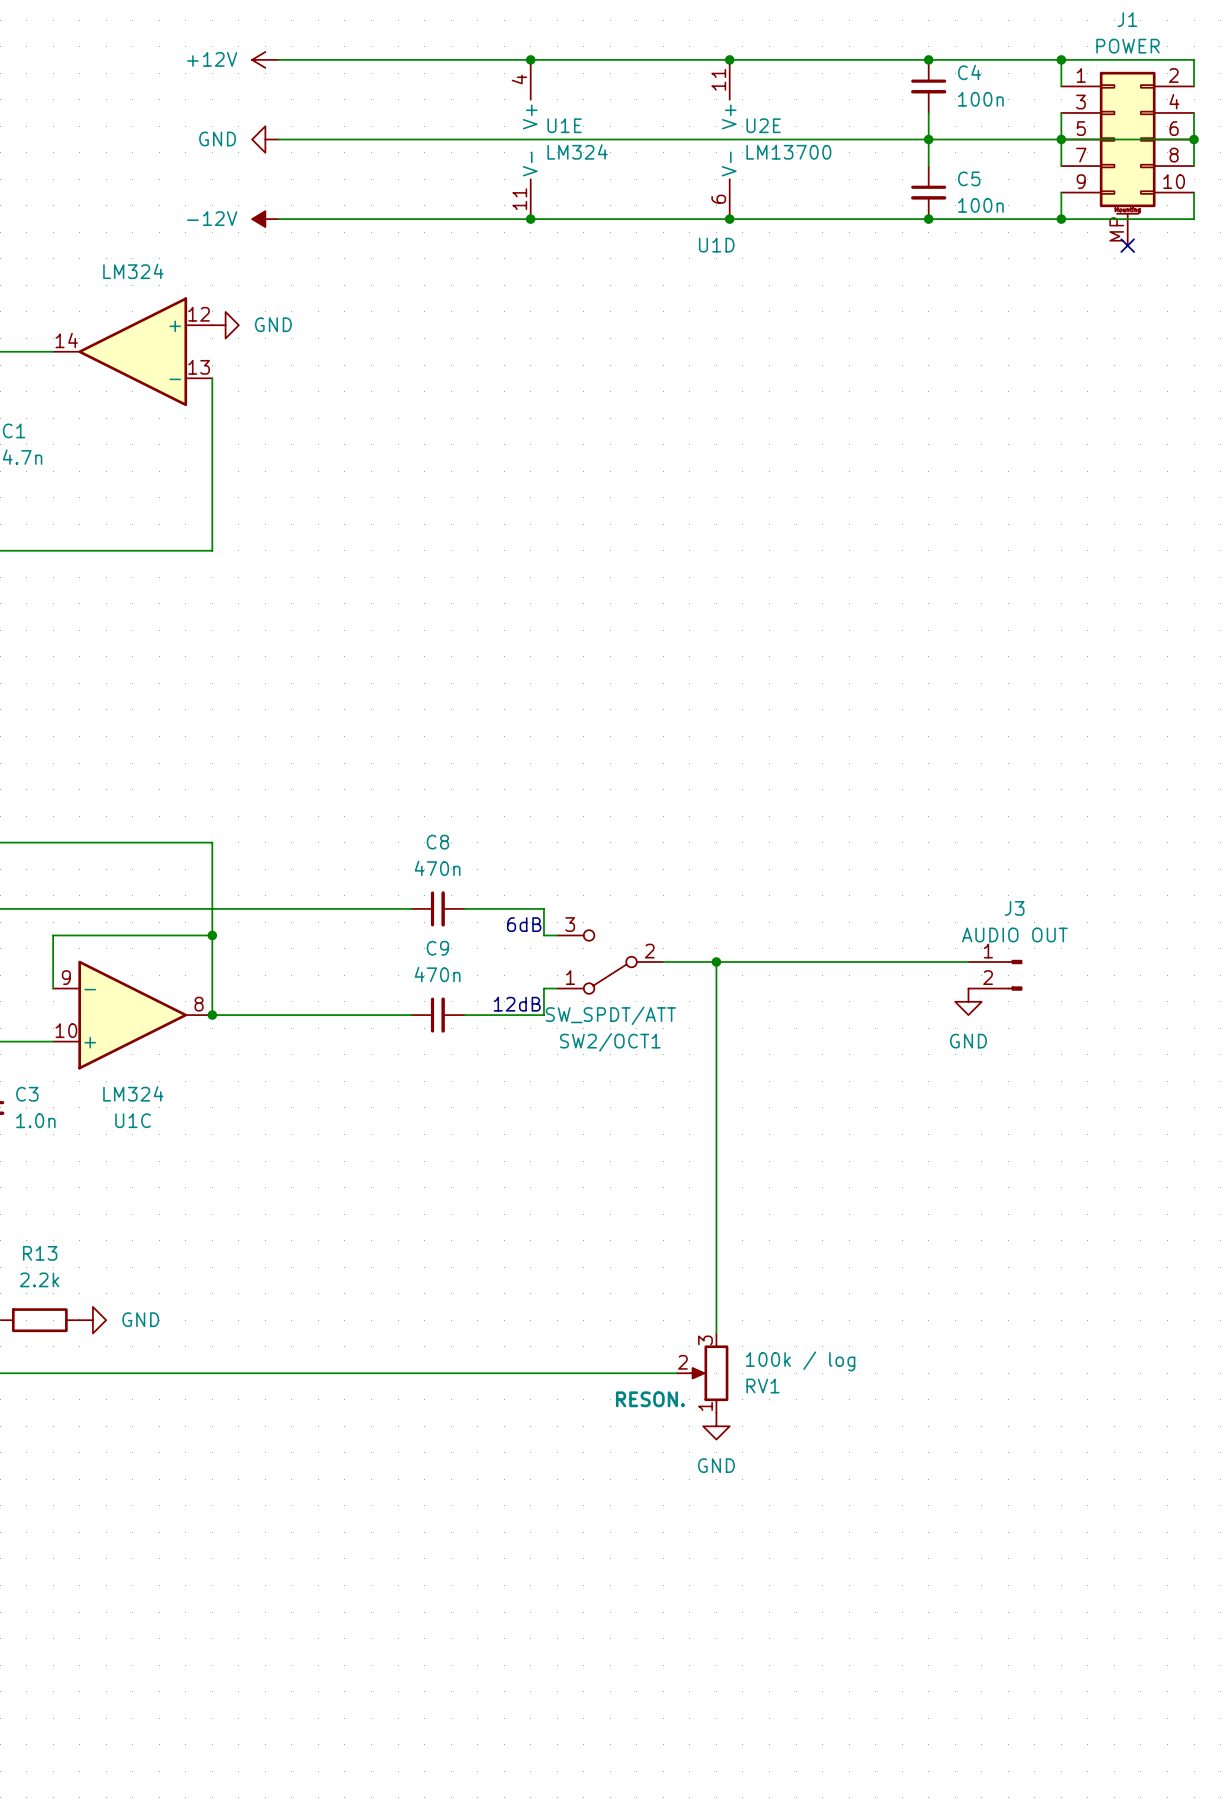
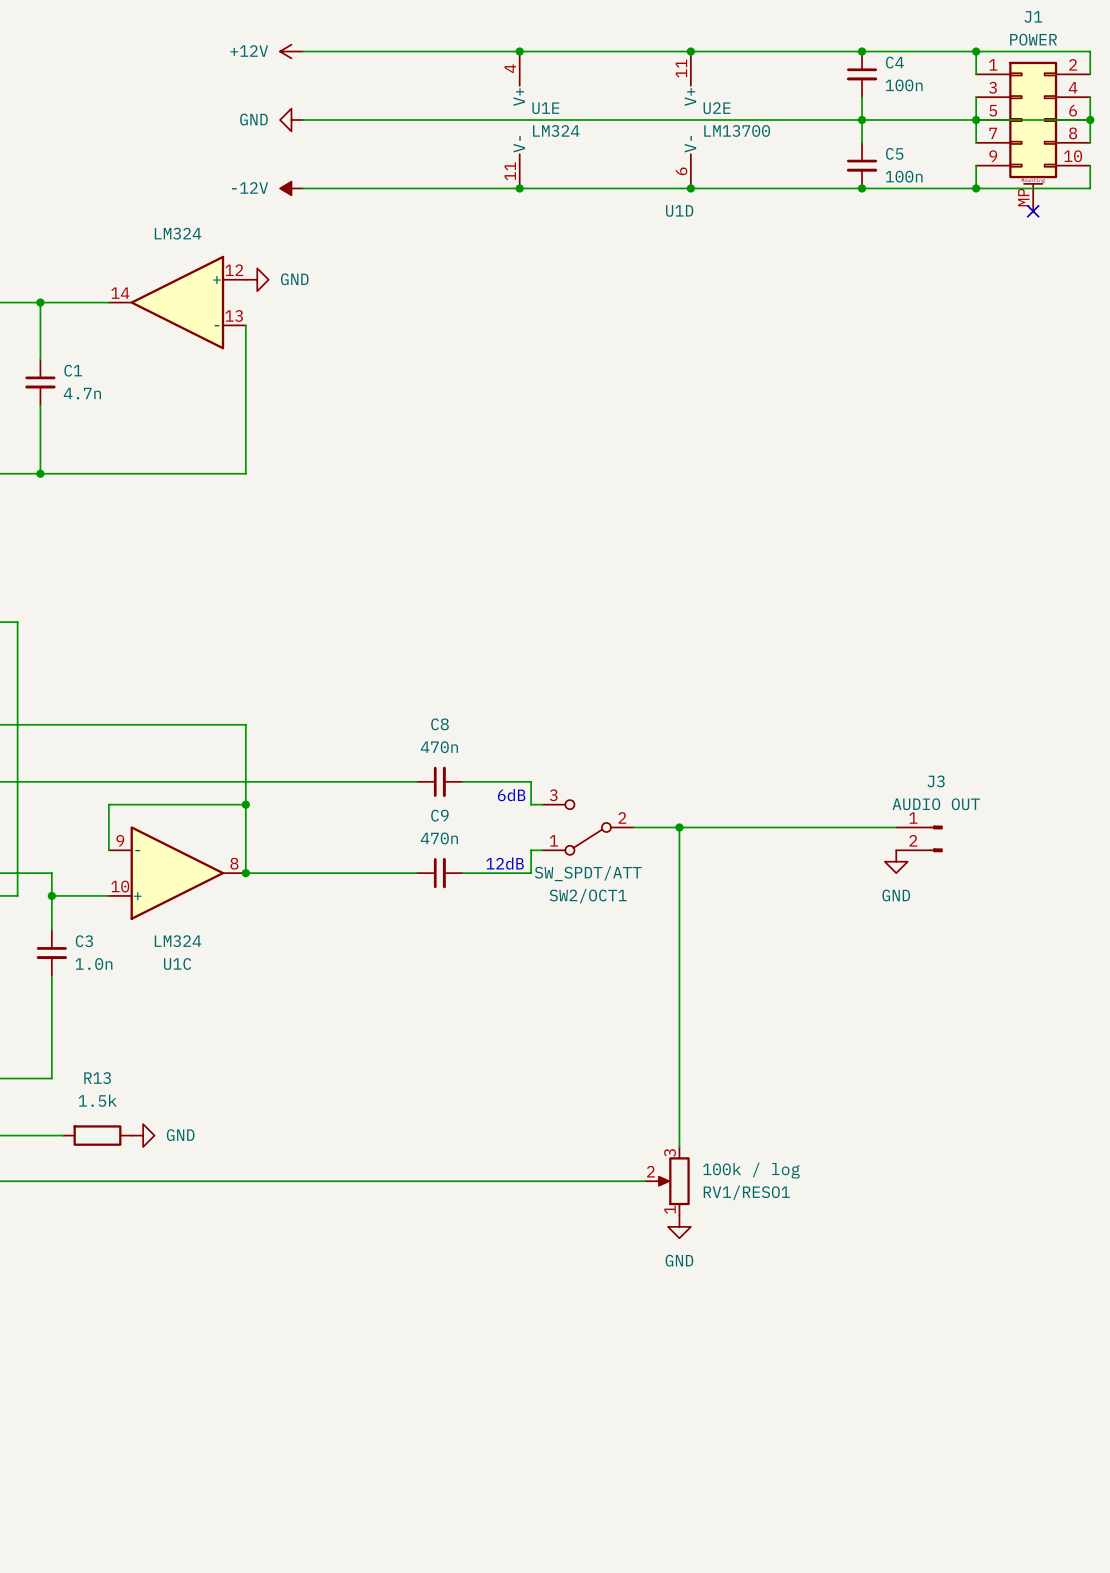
R13 value: 2.2k (39, 1279) -> 1.5k (97, 1100)
RV1 name: RV1 (762, 1386) -> RV1/RESO1 (746, 1192)
RV1 text: RESON. (650, 1399) -> none

